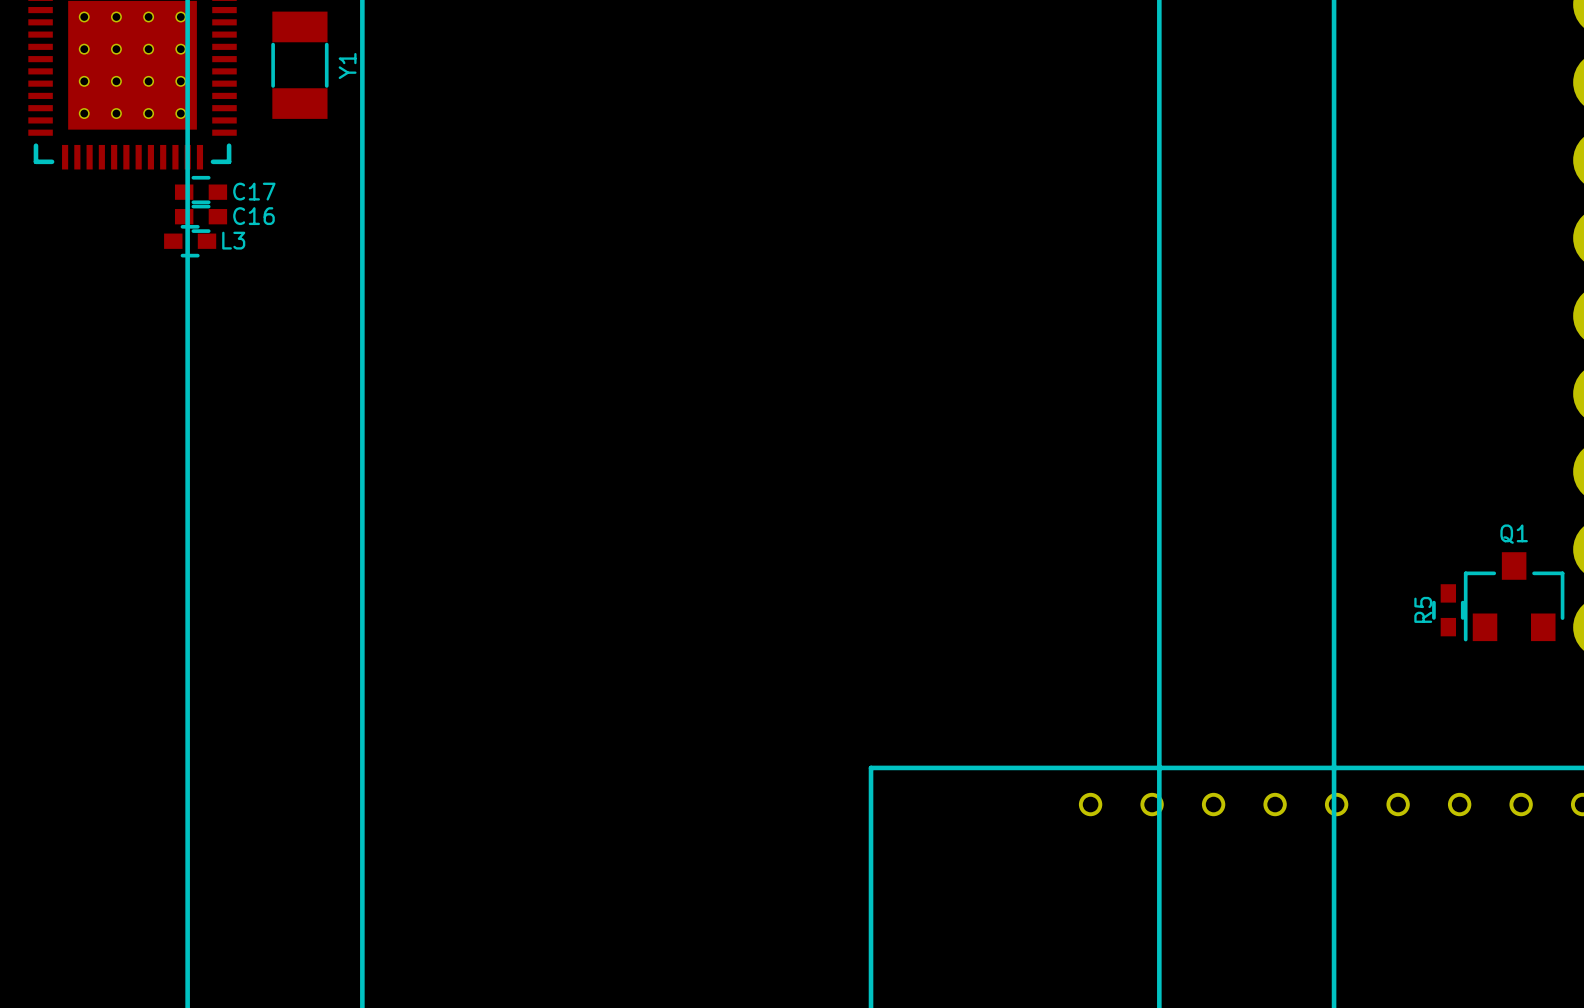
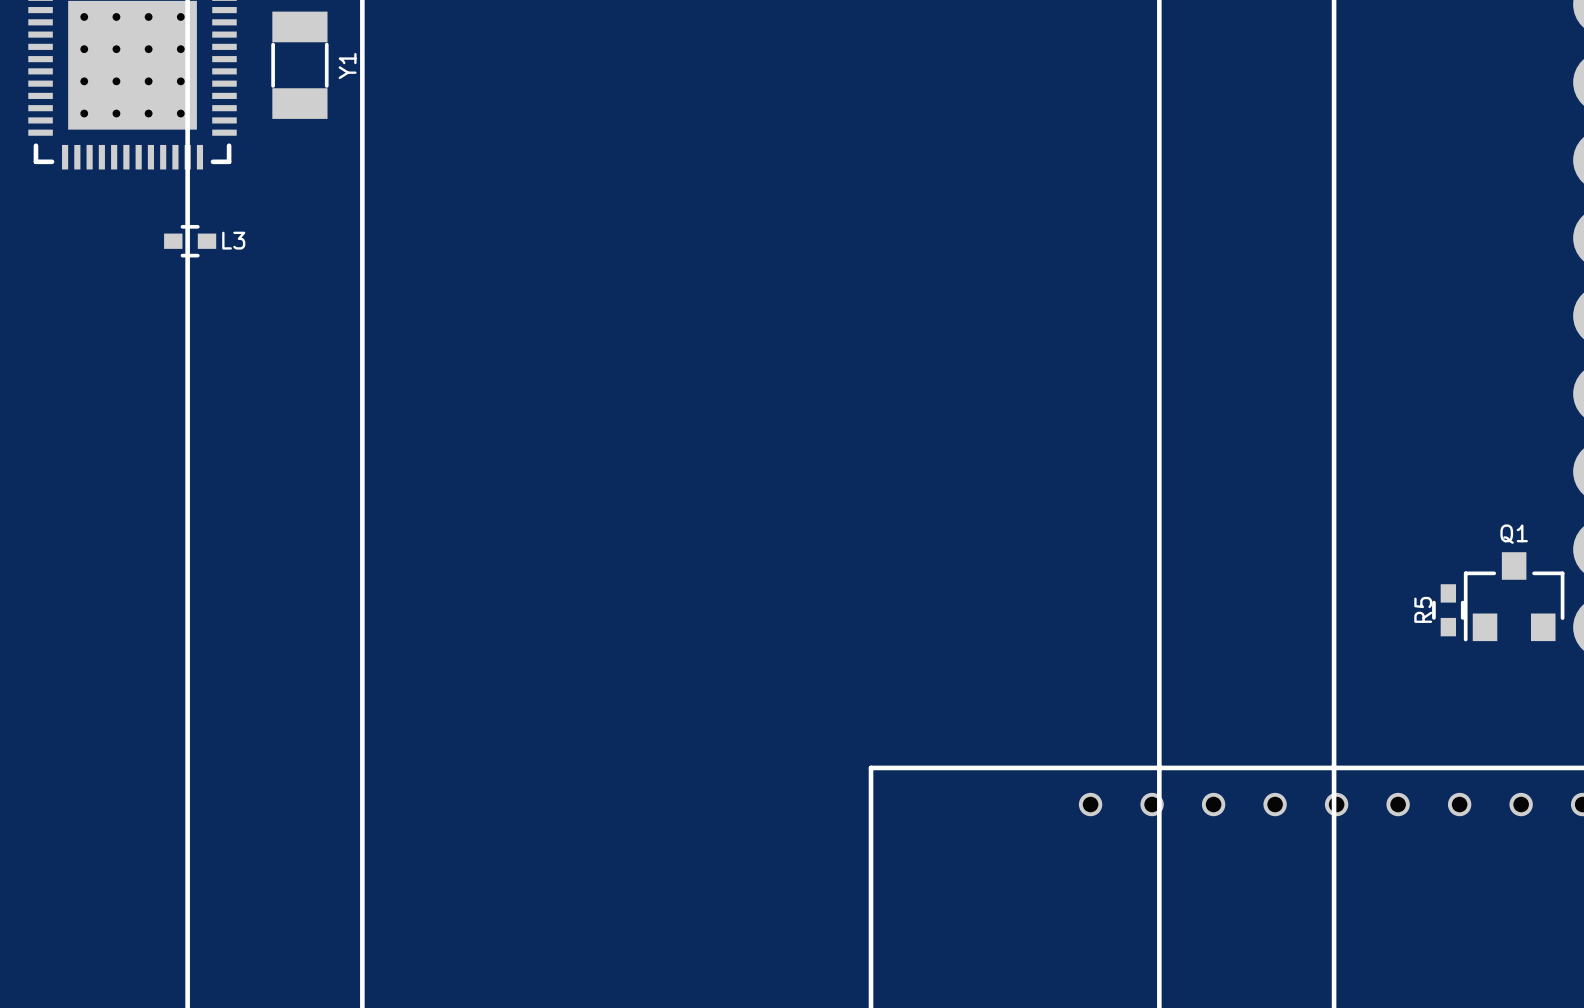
C17: (201, 192) -> none
C16: (201, 216) -> none

